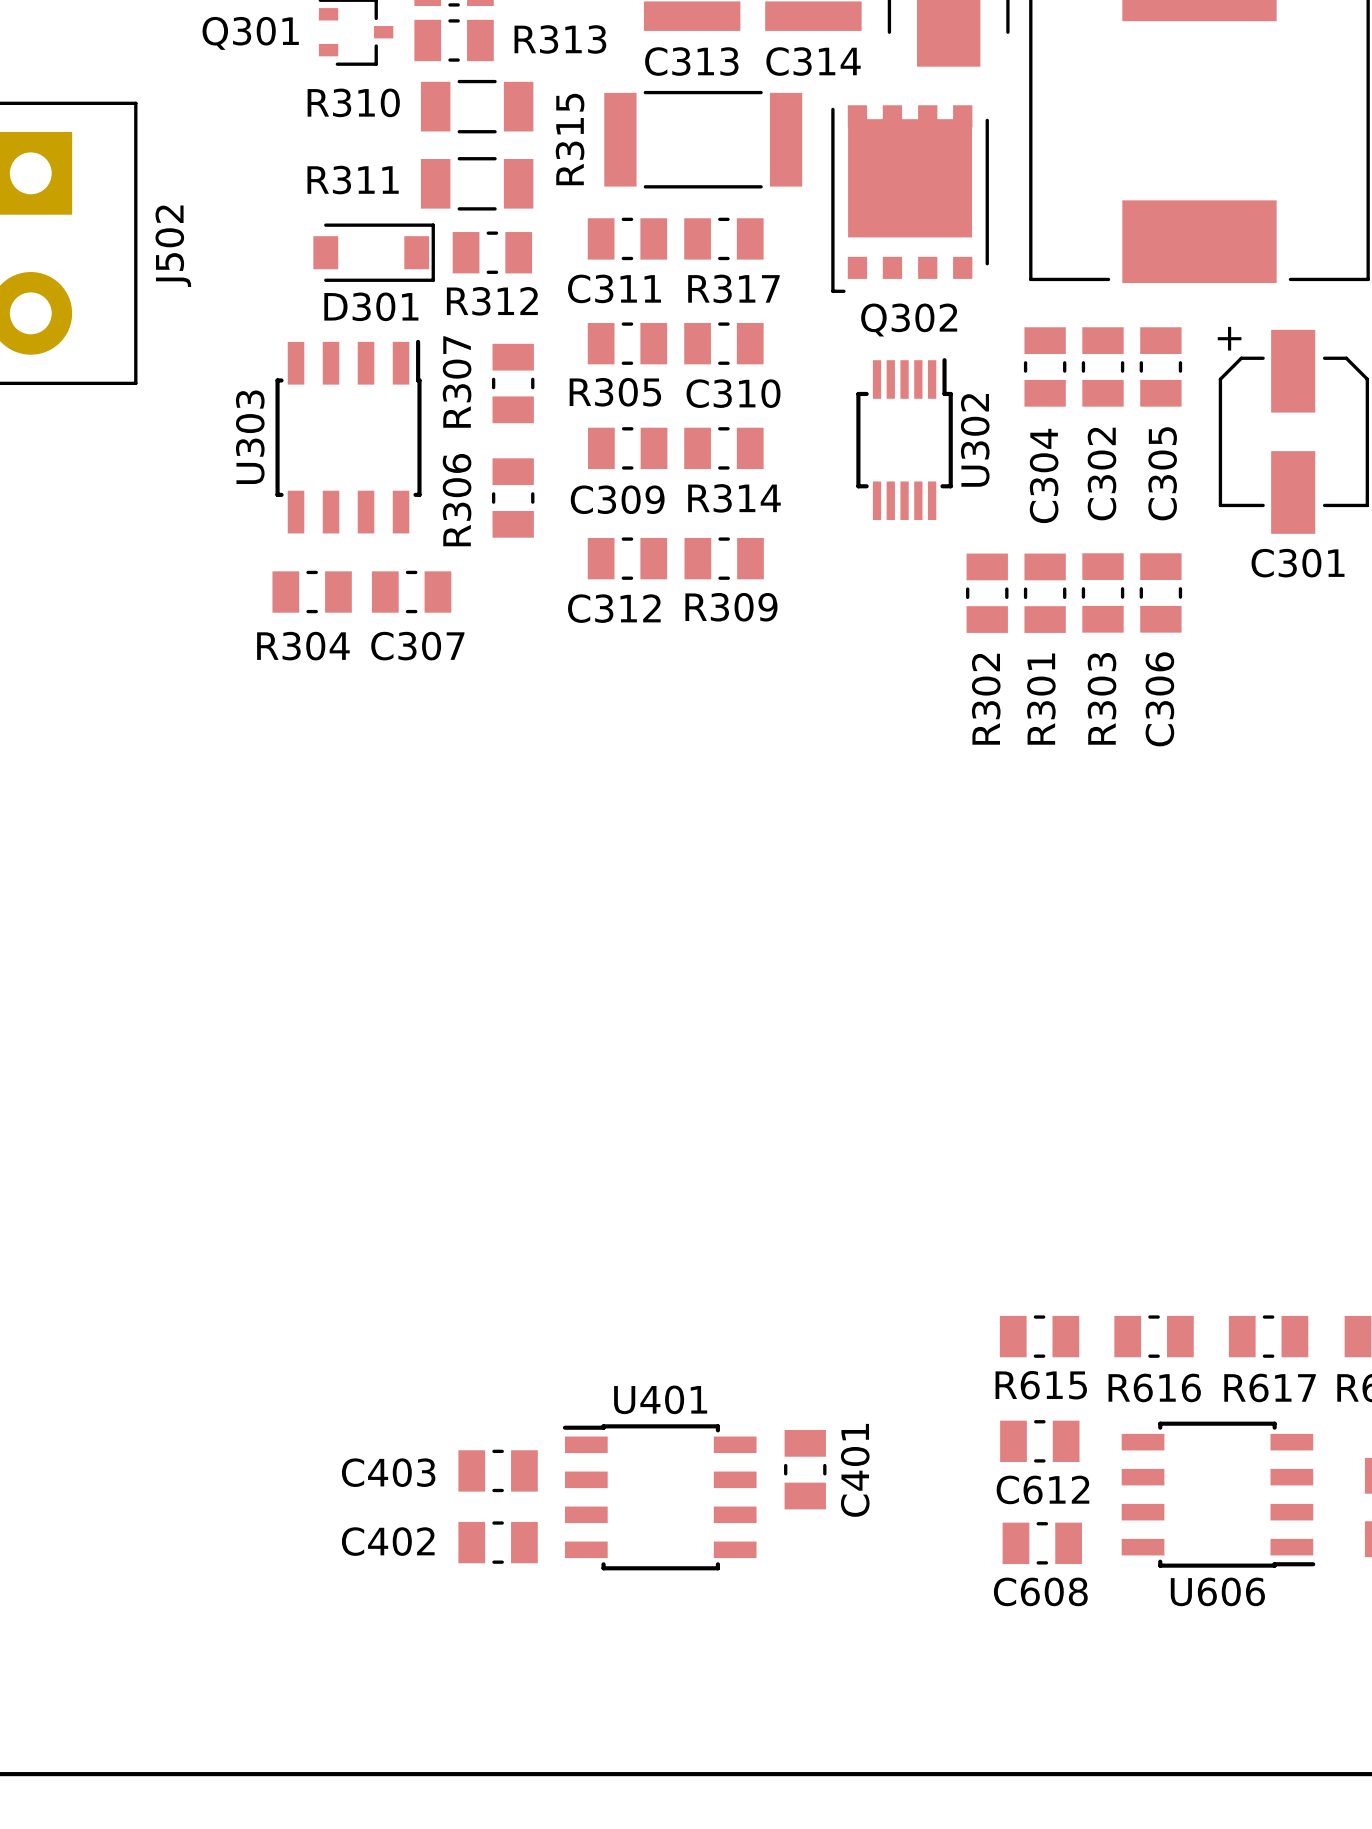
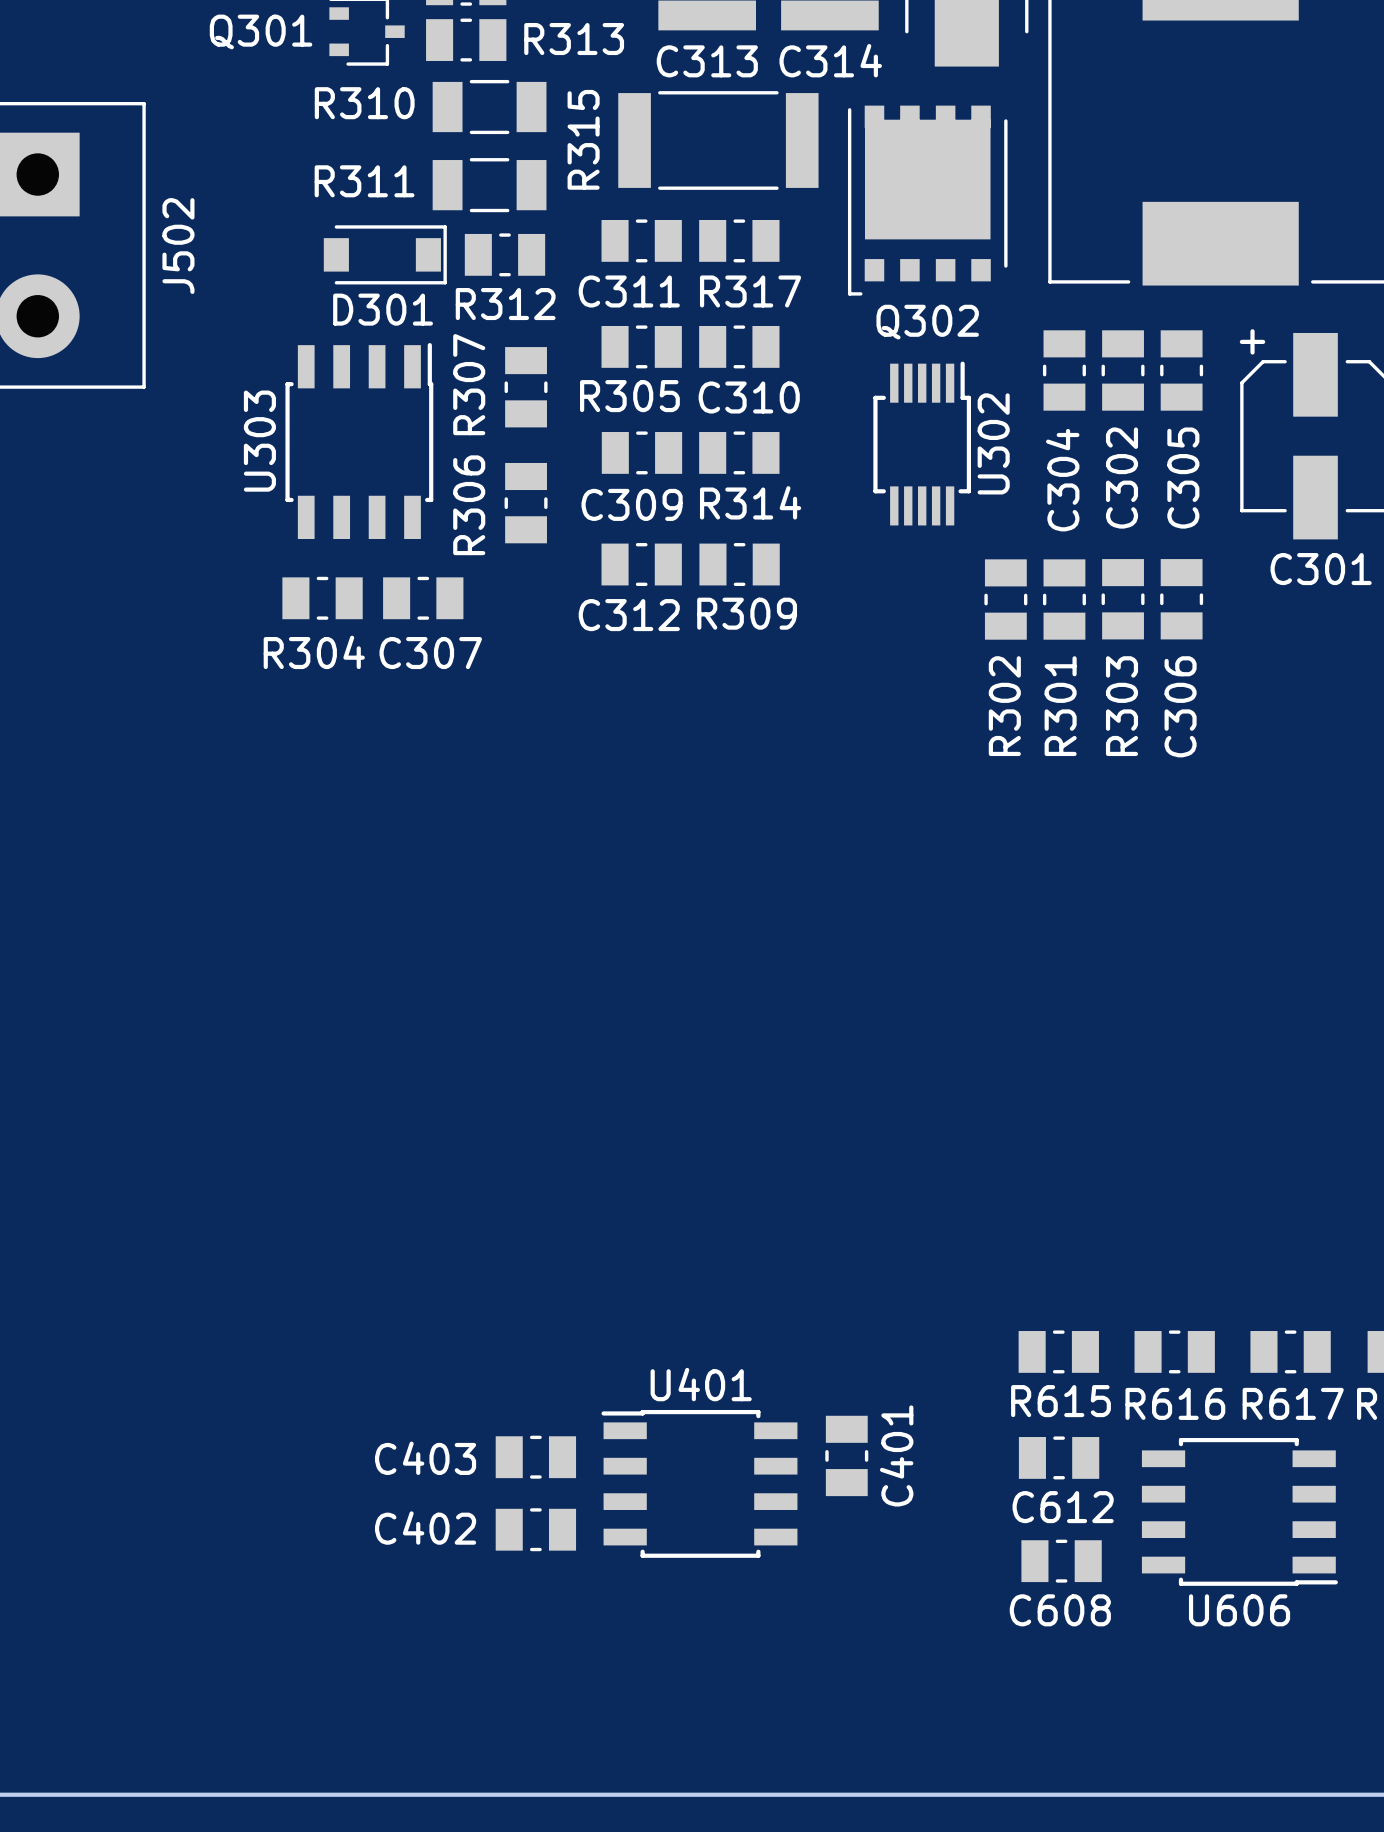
C401 position: (805, 1469) -> (846, 1455)
C403 position: (498, 1470) -> (535, 1457)
U401 position: (659, 1497) -> (699, 1483)
C402 position: (498, 1542) -> (535, 1529)

